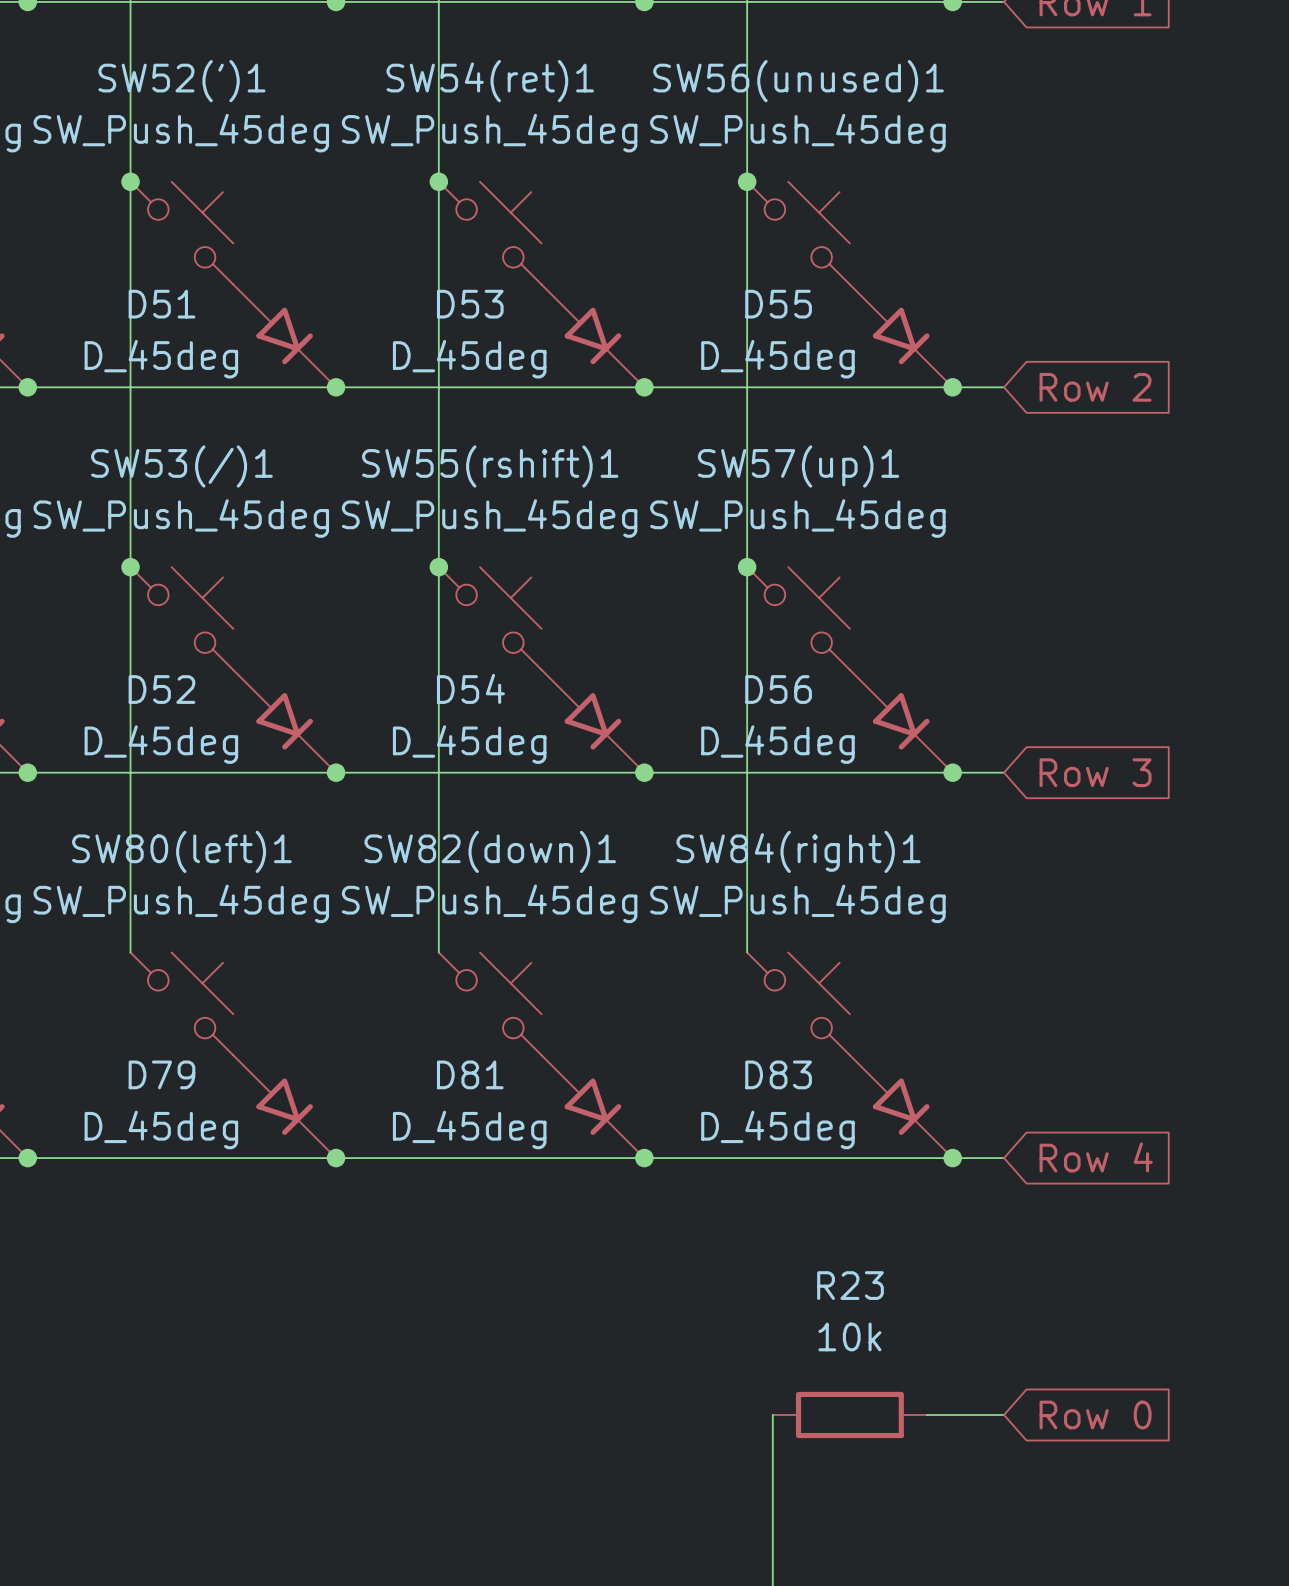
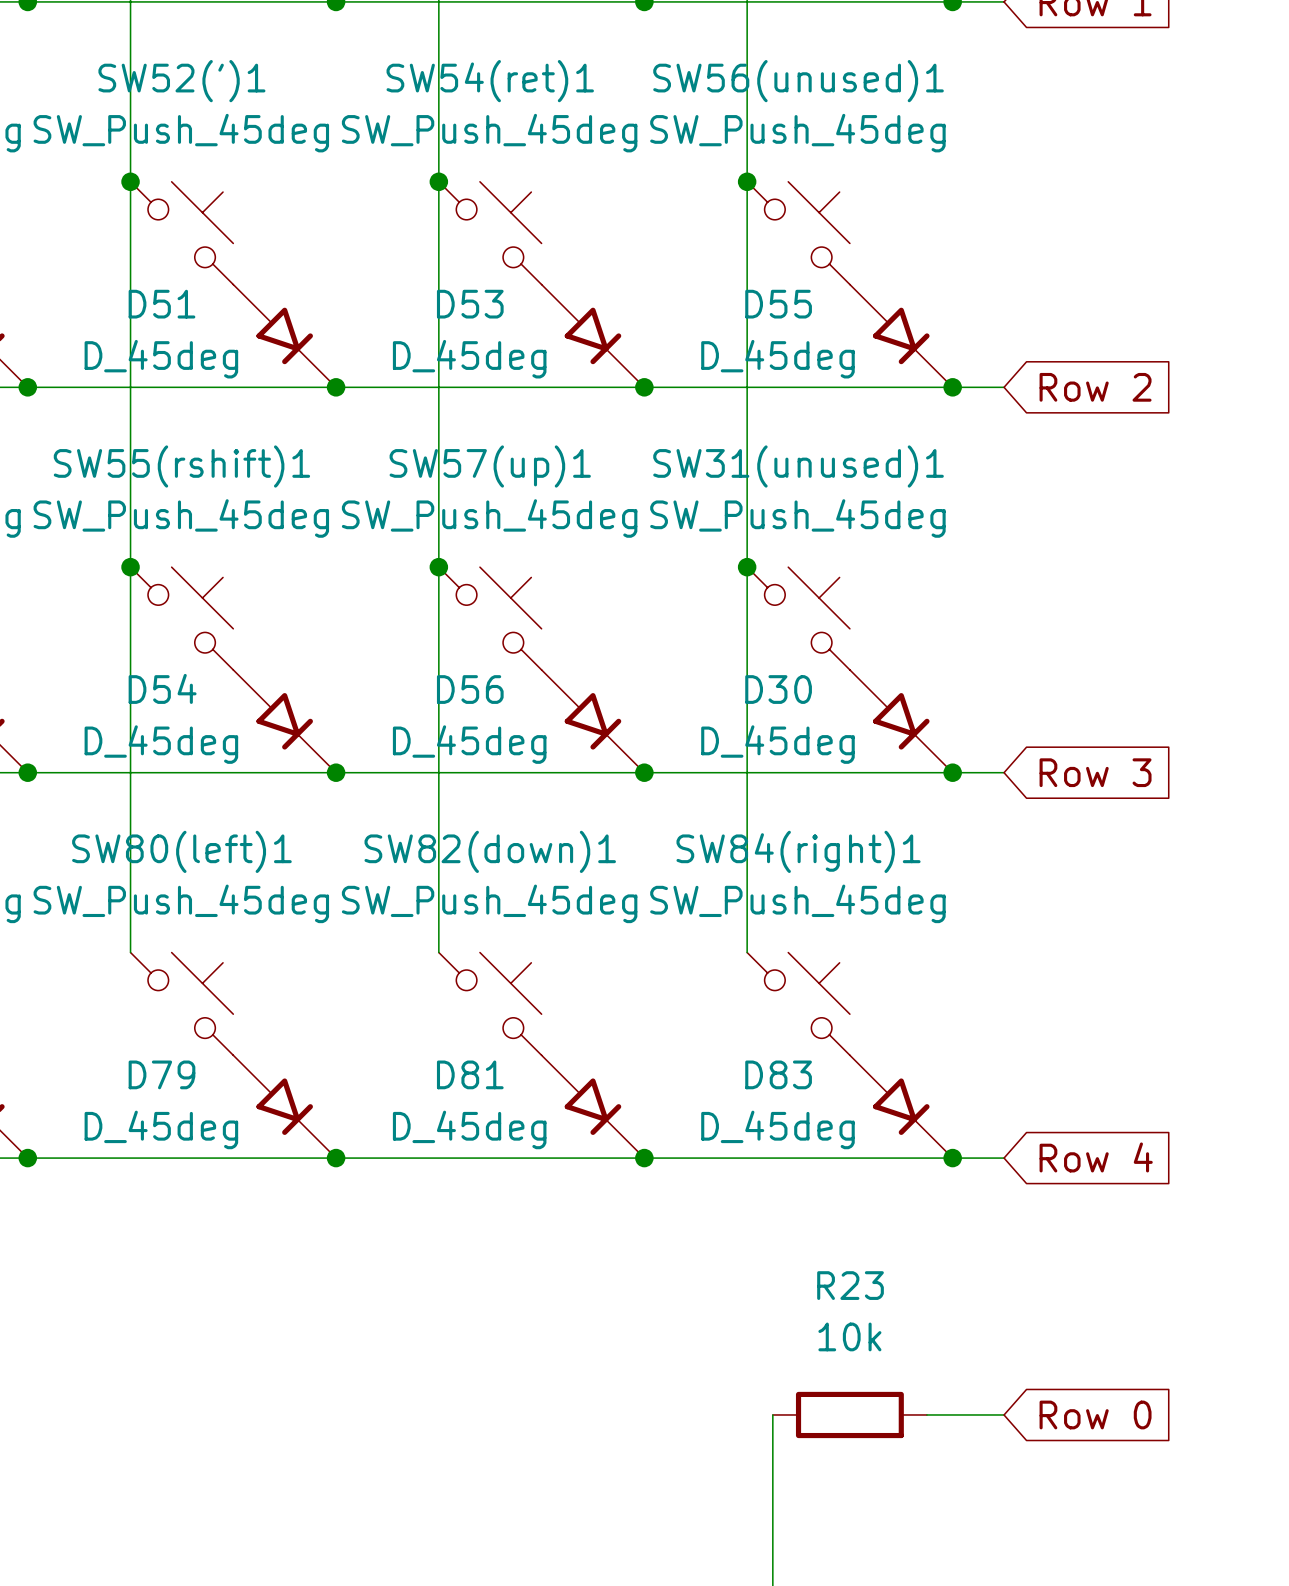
SW53(/)1 name: SW53(/)1 (181, 466) -> SW55(rshift)1 (181, 466)
SW55(rshift)1 name: SW55(rshift)1 (490, 466) -> SW57(up)1 (490, 466)
SW57(up)1 name: SW57(up)1 (798, 466) -> SW31(unused)1 (798, 466)
D54 name: D54 (470, 688) -> D56 (470, 689)
D52 name: D52 (161, 689) -> D54 (162, 688)
D56 name: D56 (778, 689) -> D30 (778, 689)

